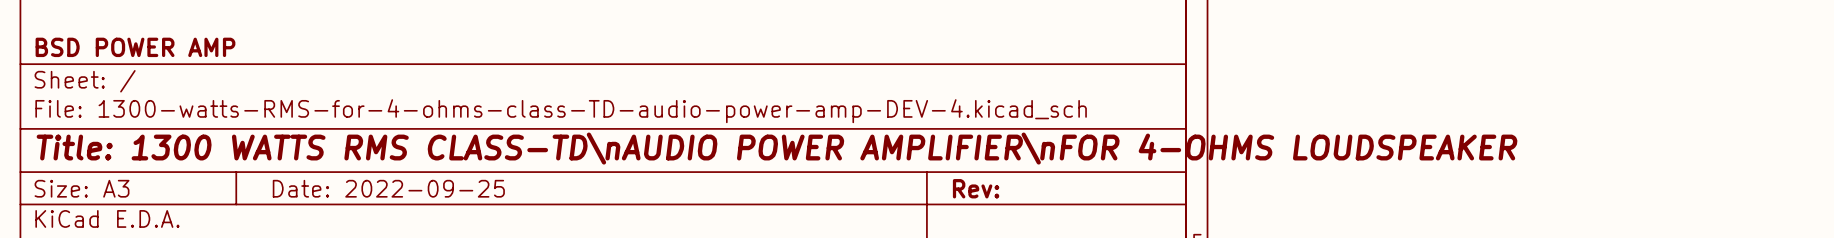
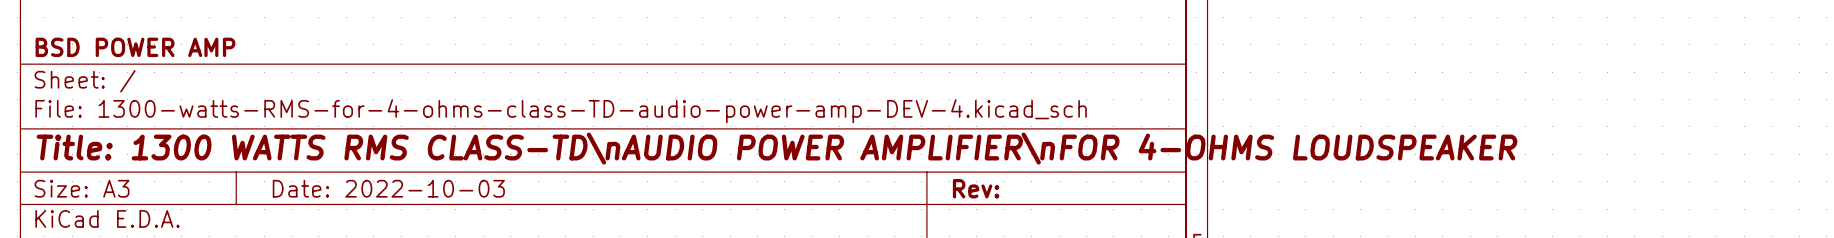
title block: Date: 2022-09-25 (388, 188) -> Date: 2022-10-03 (388, 188)

